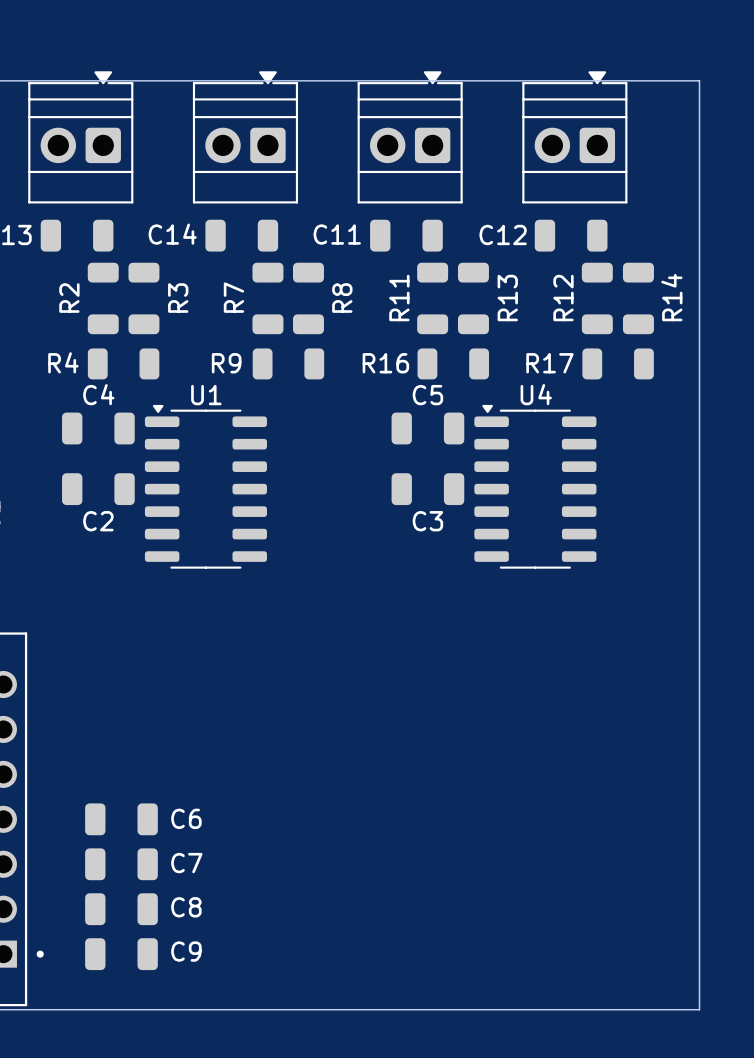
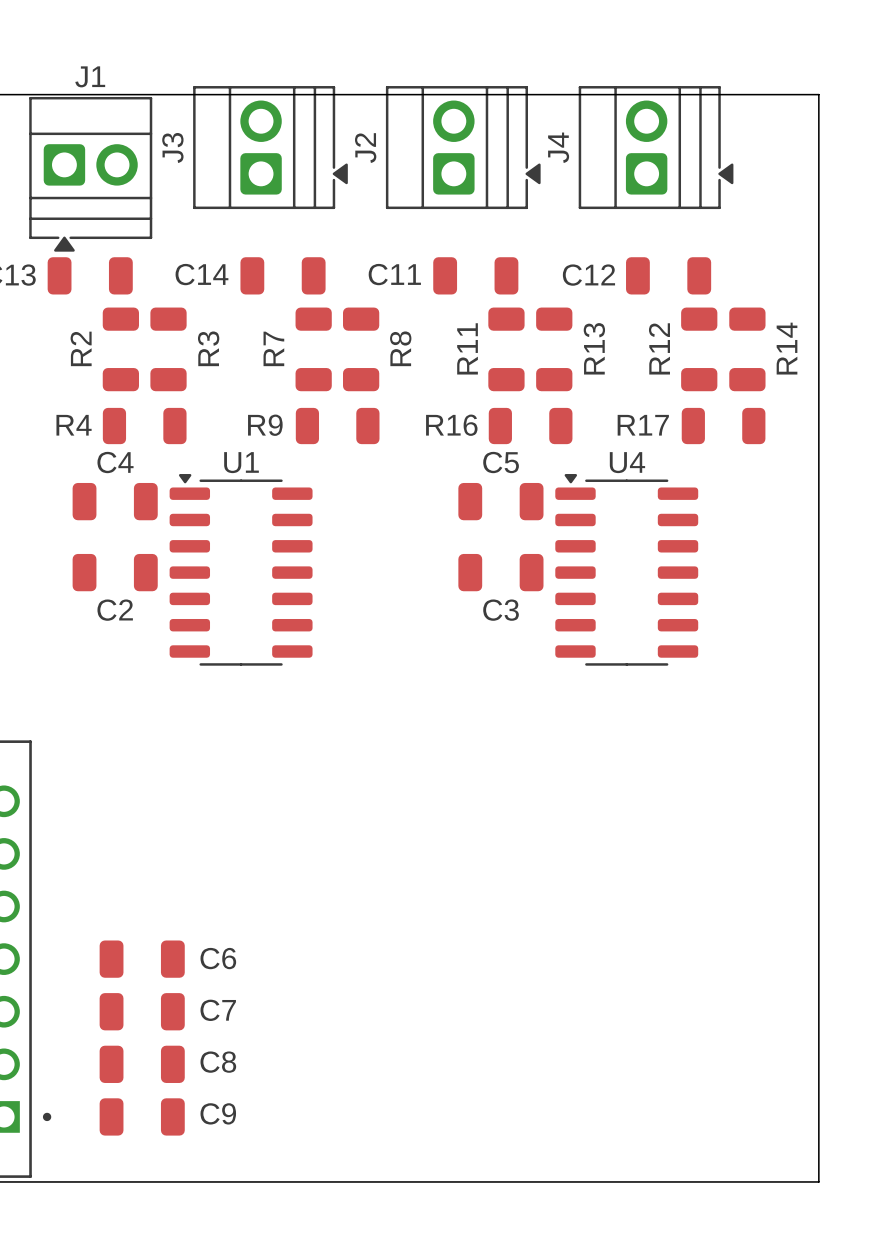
J3: none -> (270, 147)
J2: none -> (463, 147)
J4: none -> (656, 147)
part: (80, 137) -> none
part: (245, 137) -> none
part: (410, 137) -> none
part: (574, 137) -> none
J1: none -> (90, 174)

